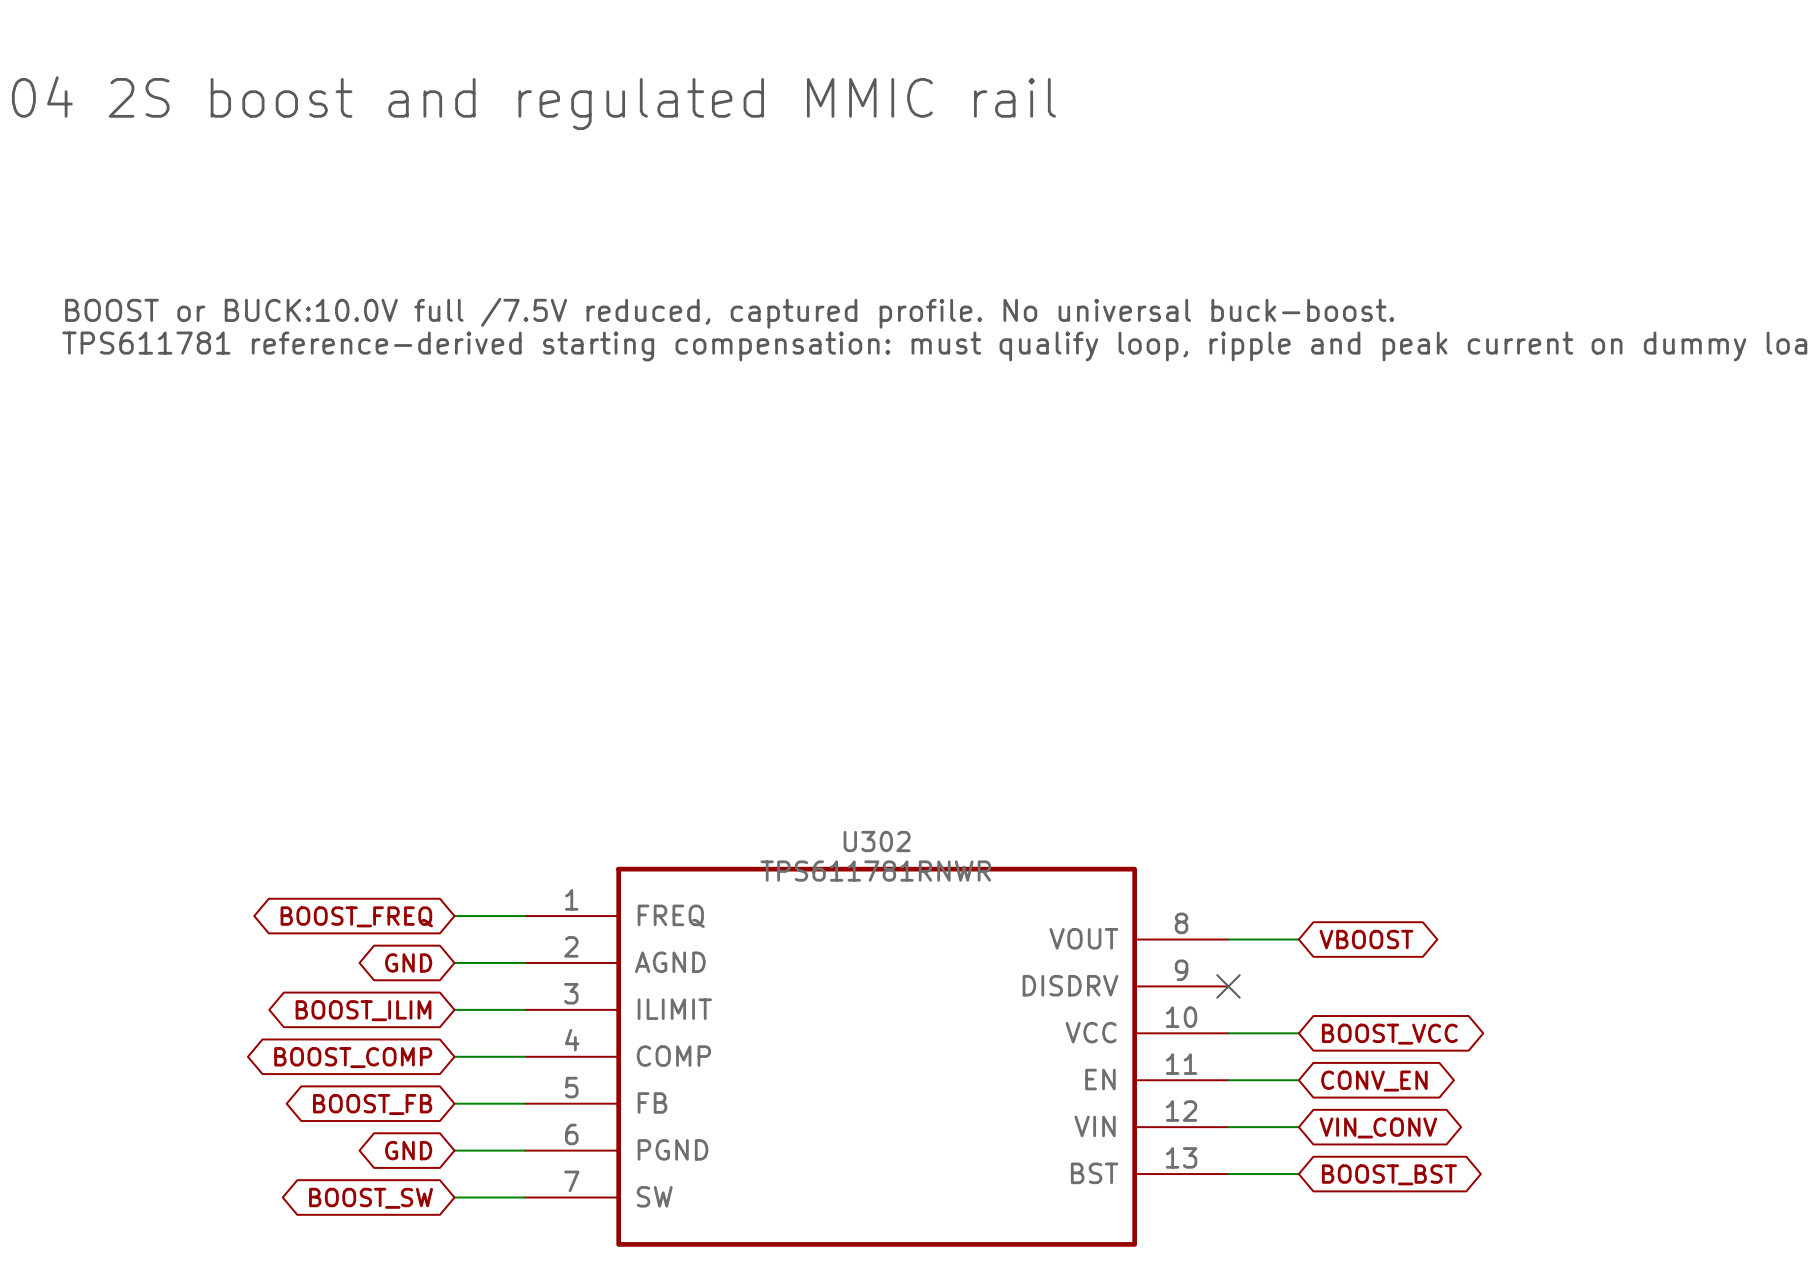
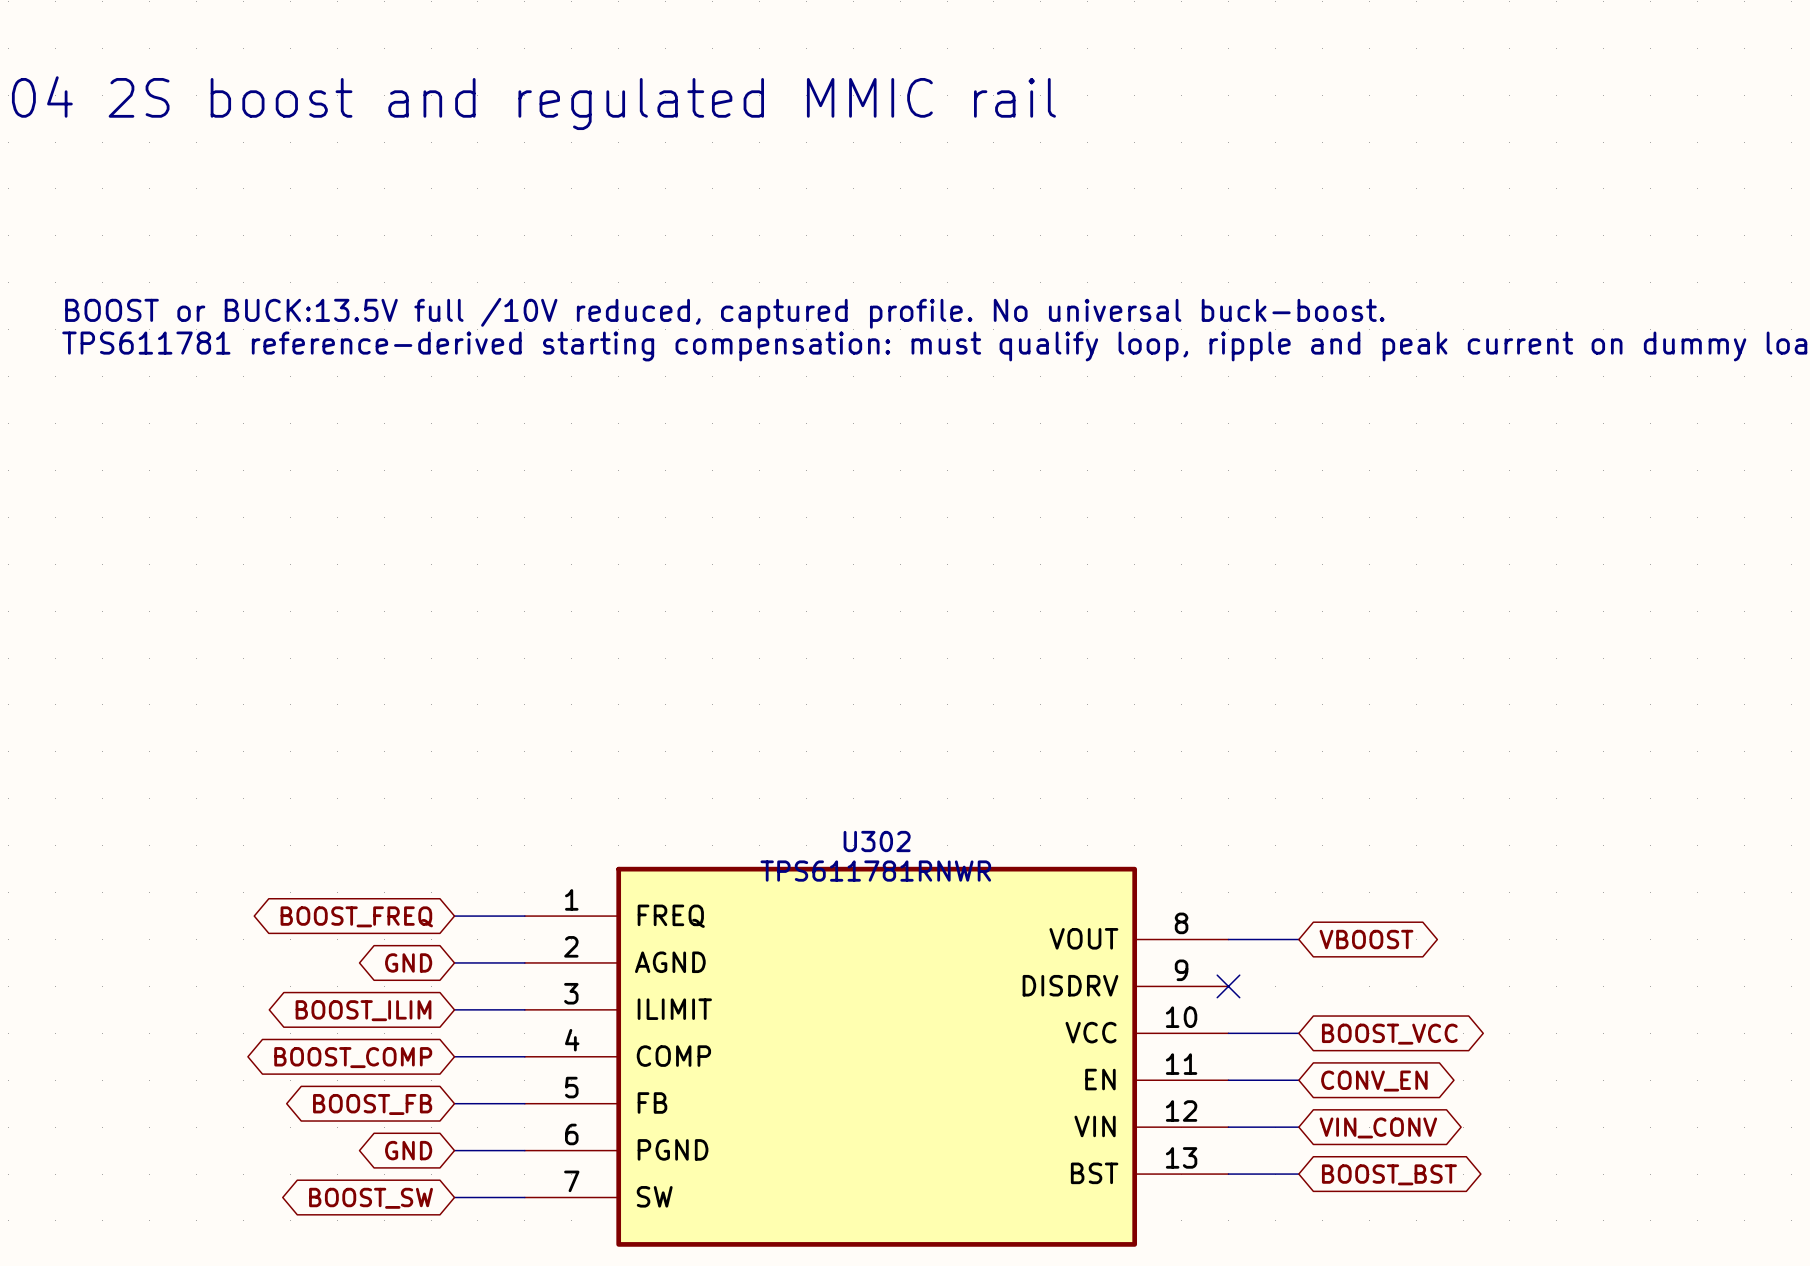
text: BOOST or BUCK:10.0V full /7.5V reduced, captured profile. No universal buck-boost. (729, 313) -> BOOST or BUCK:13.5V full /10V reduced, captured profile. No universal buck-boost. (724, 313)

